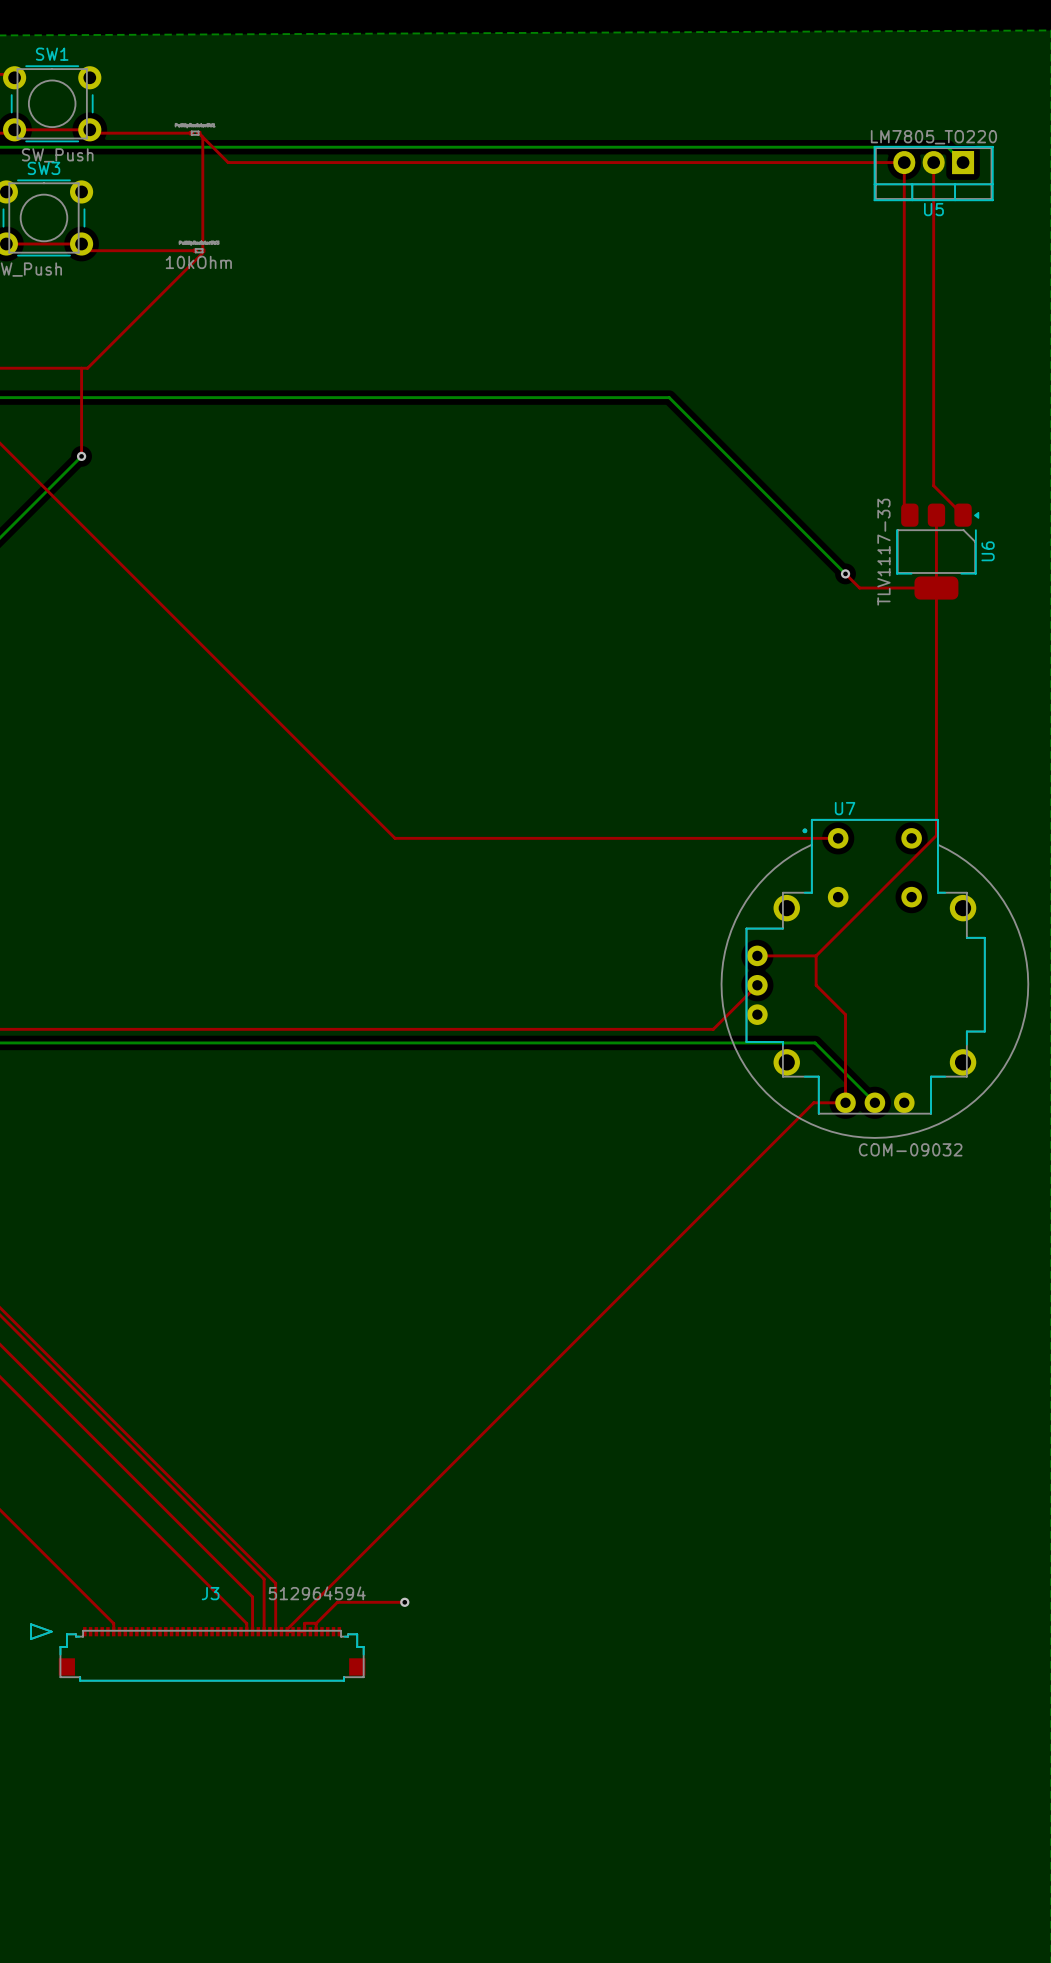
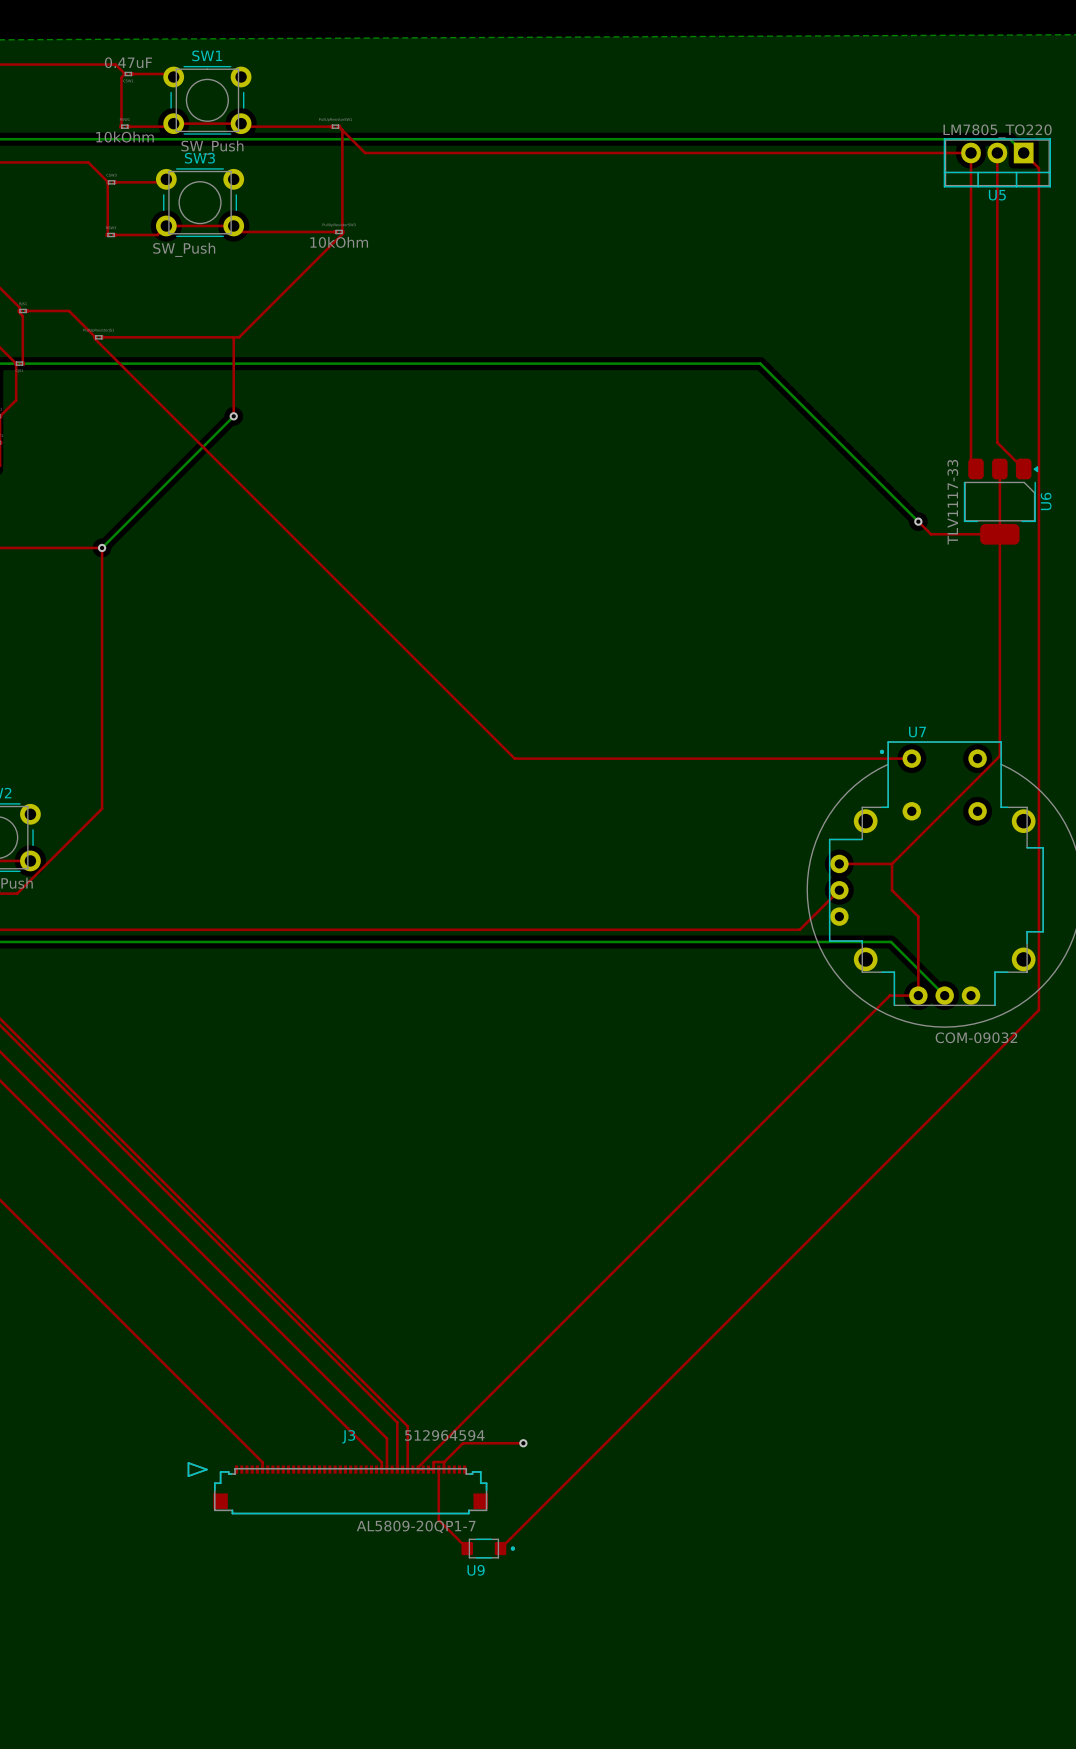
top track: none -> (1023, 152) (1038, 168) (1038, 1010) (500, 1548)
top track: none -> (438, 1469) (438, 1520) (467, 1548)
U9: none -> AL5809-20QP1-7 (488, 1548)

